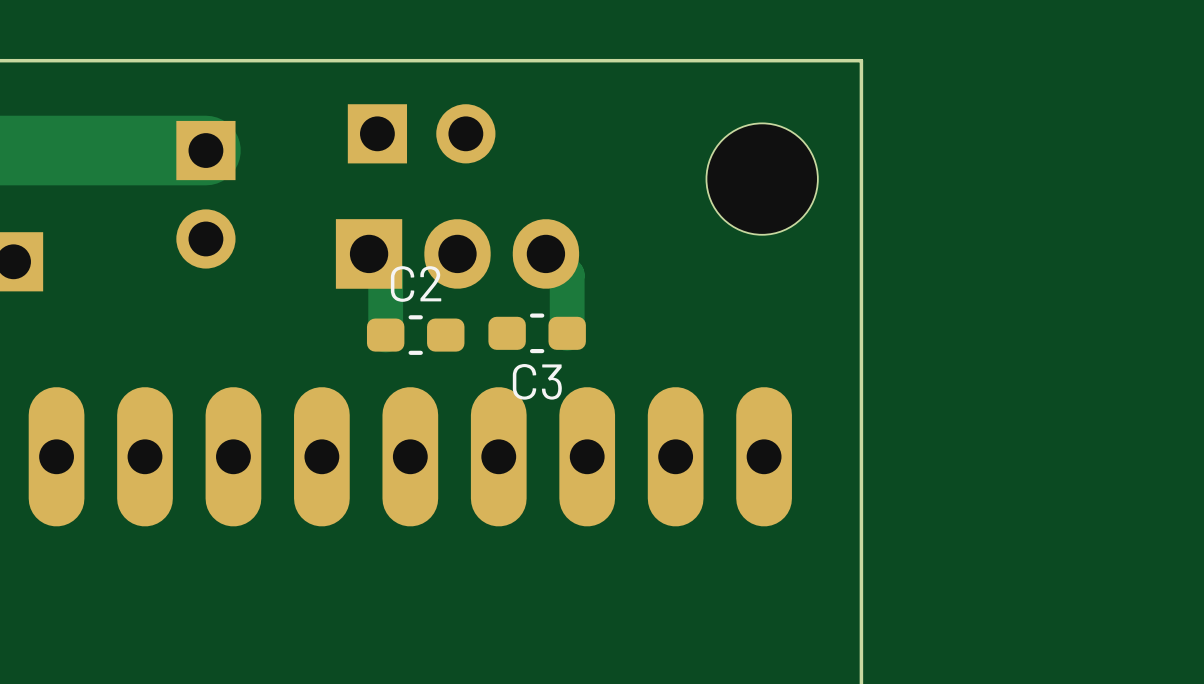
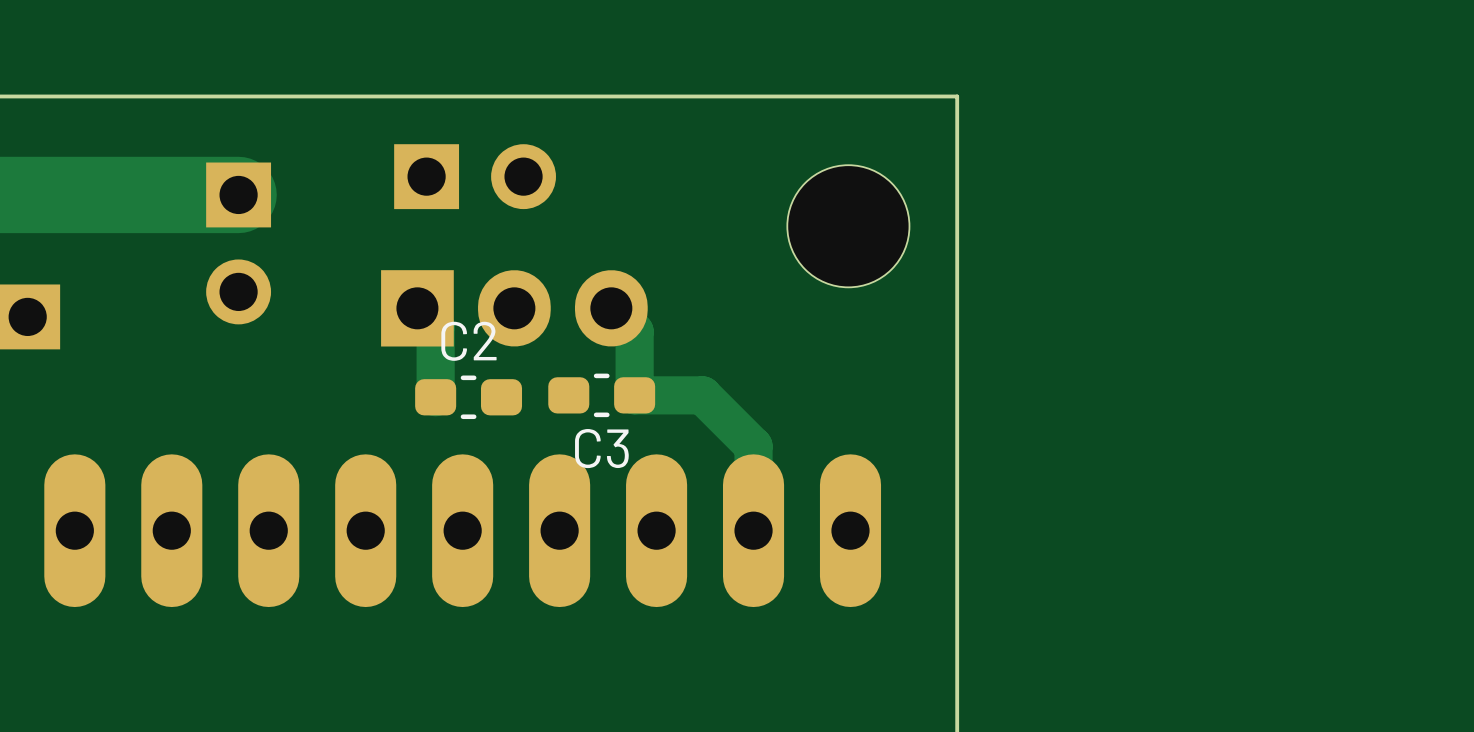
track: none -> (634, 395) (702, 395) (753, 446) (753, 530)

